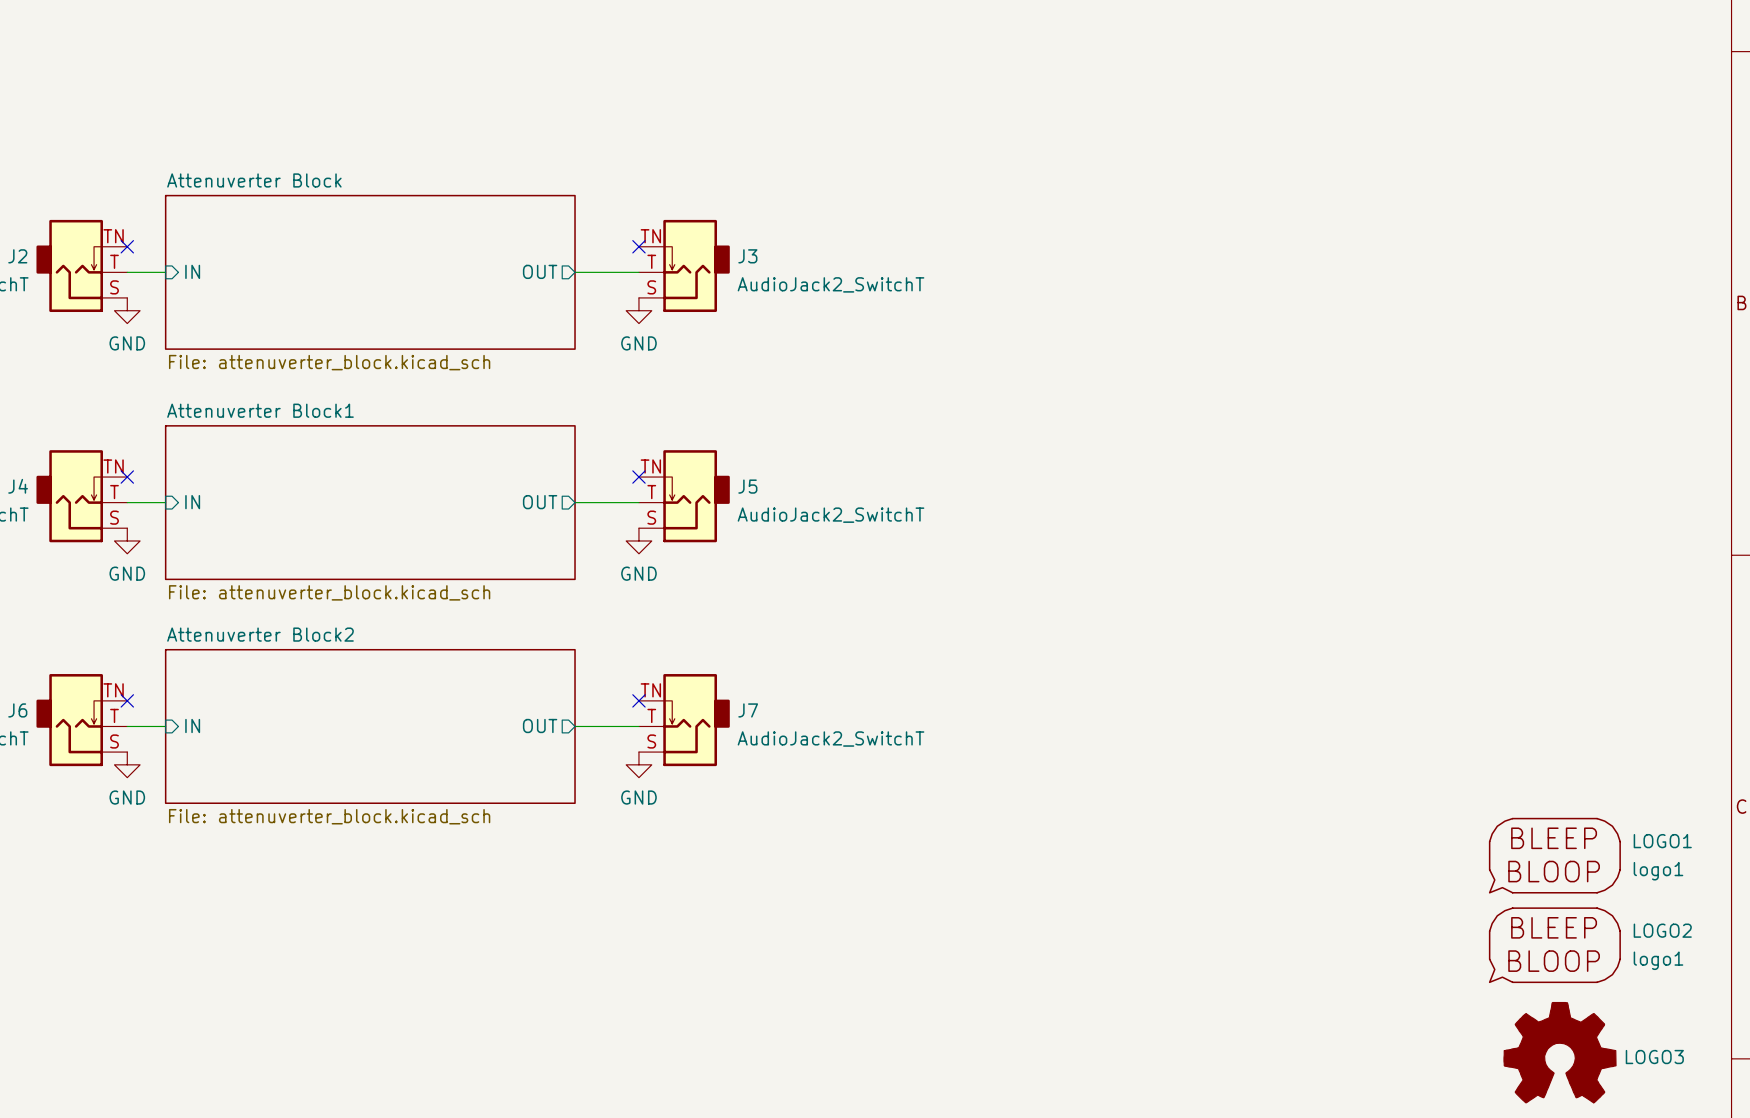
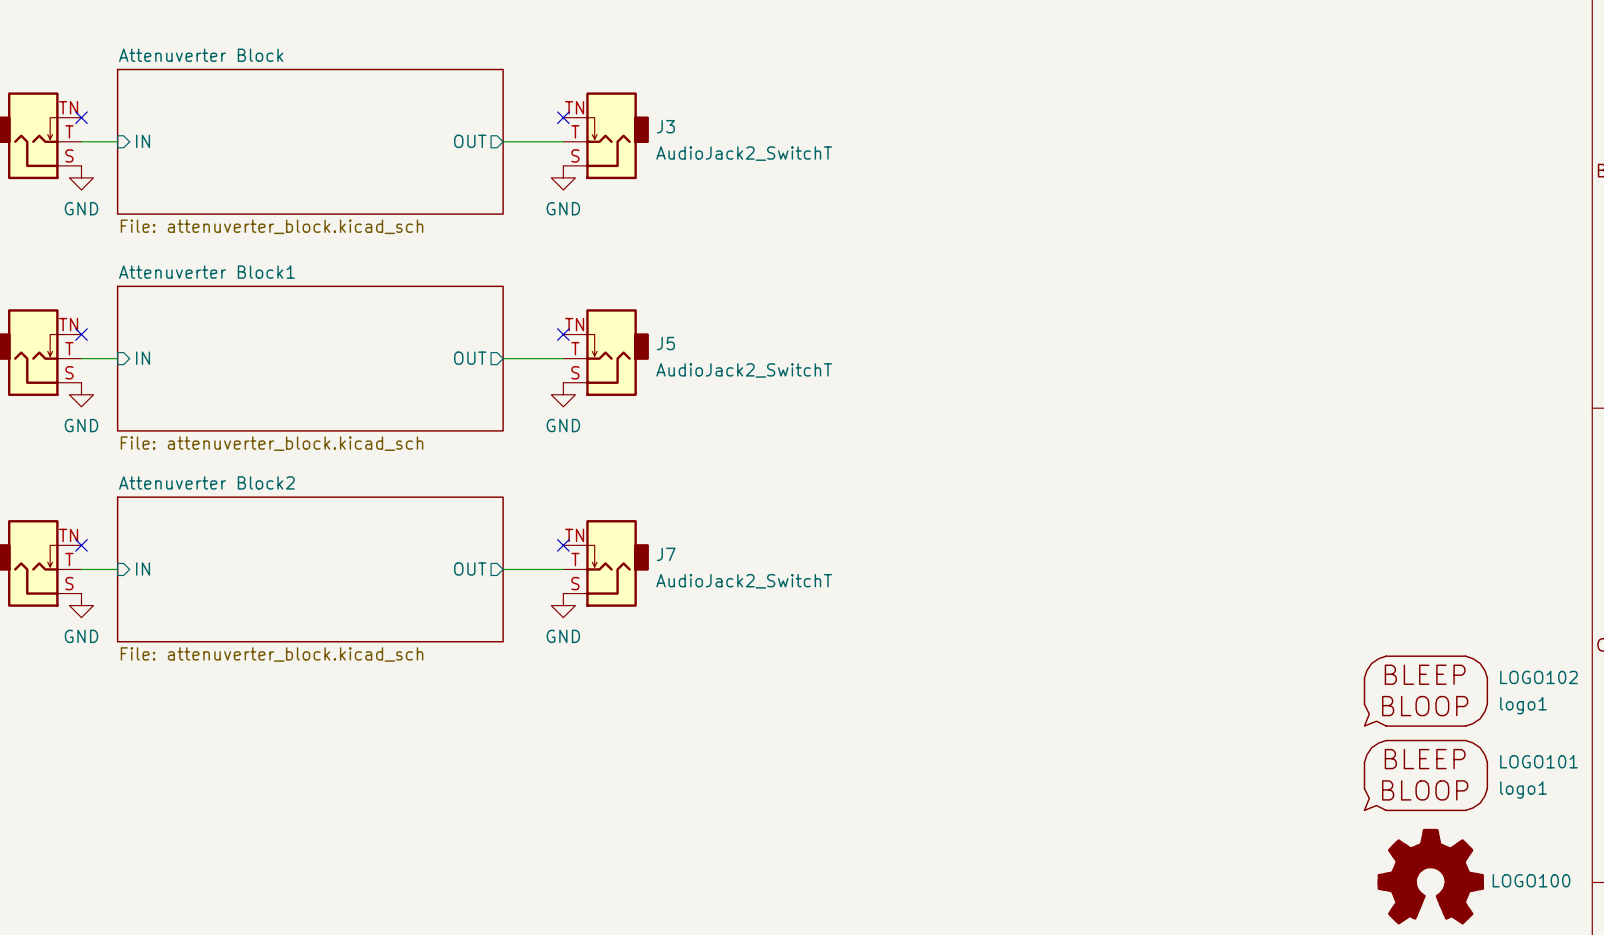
LOGO1 name: LOGO1 (1662, 841) -> LOGO102 (1538, 677)
LOGO2 name: LOGO2 (1662, 930) -> LOGO101 (1538, 761)
LOGO3 name: LOGO3 (1654, 1057) -> LOGO100 (1531, 880)

